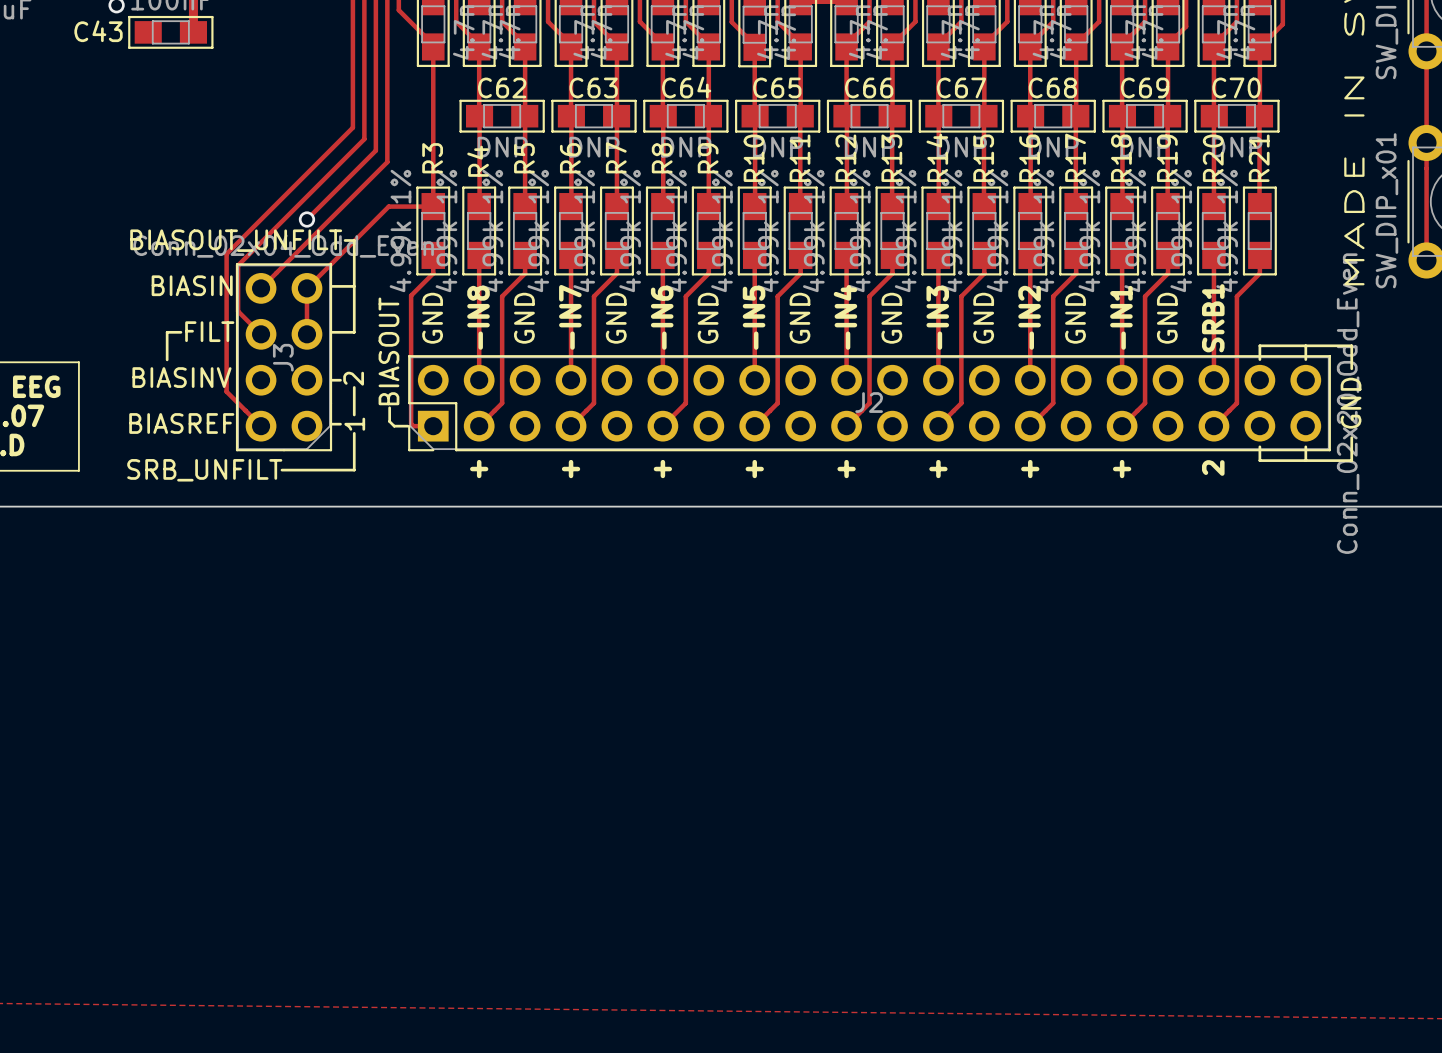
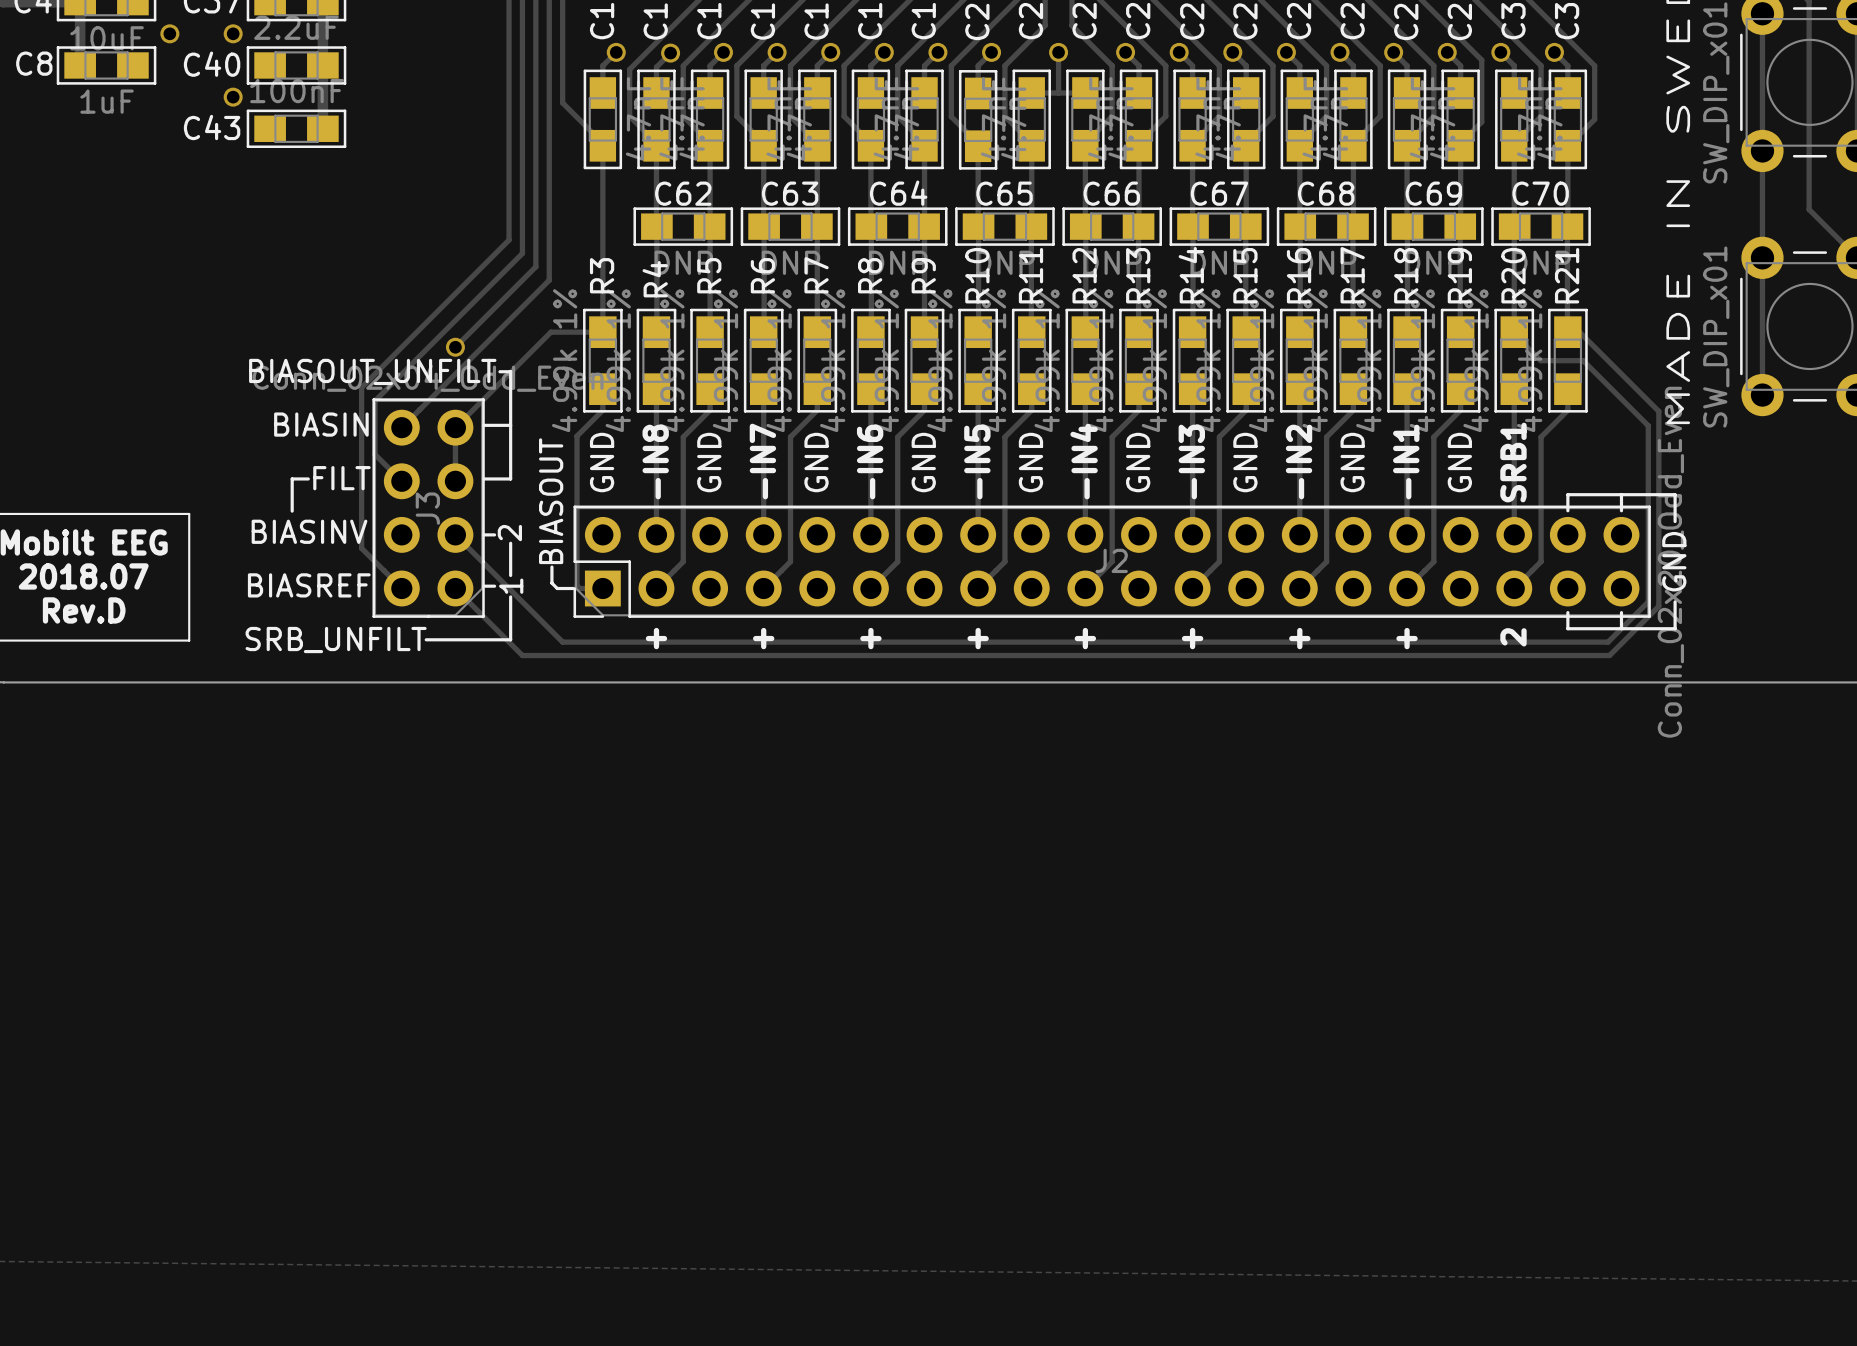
track: none -> (1514, 332) (1540, 360) (1583, 360) (1648, 425) (1648, 601) (1608, 642) (562, 642) (455, 534)
track: none -> (1567, 332) (1579, 332) (1658, 411) (1658, 606) (1609, 655) (522, 655) (455, 588)

